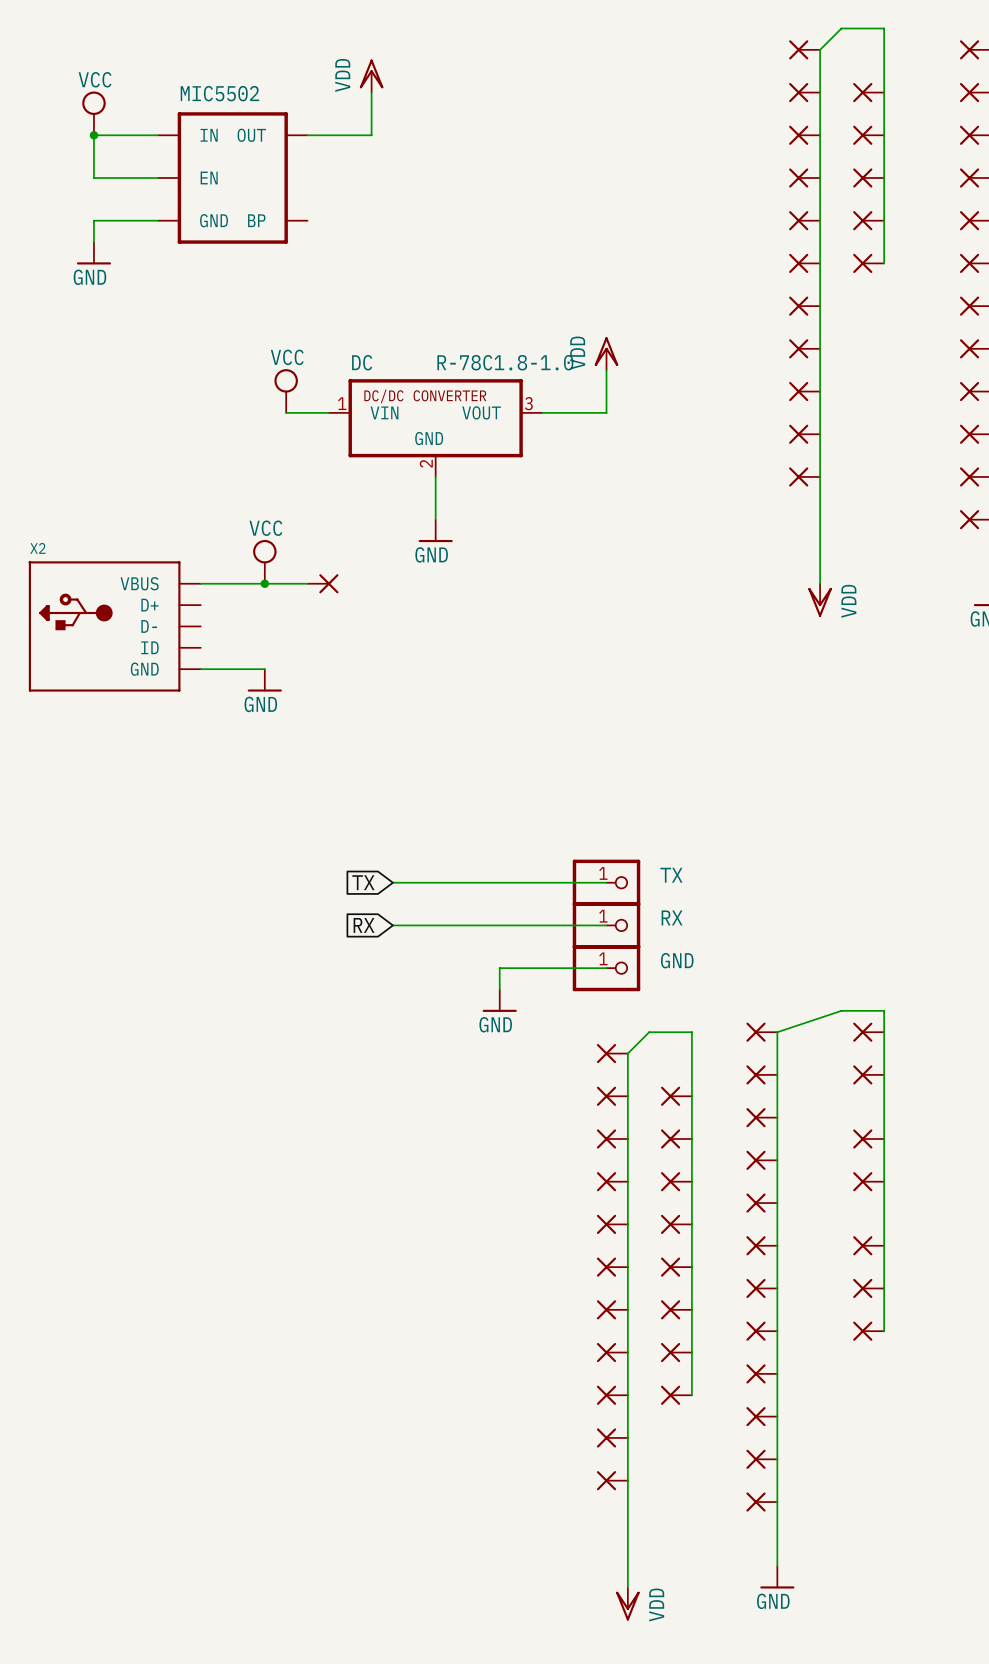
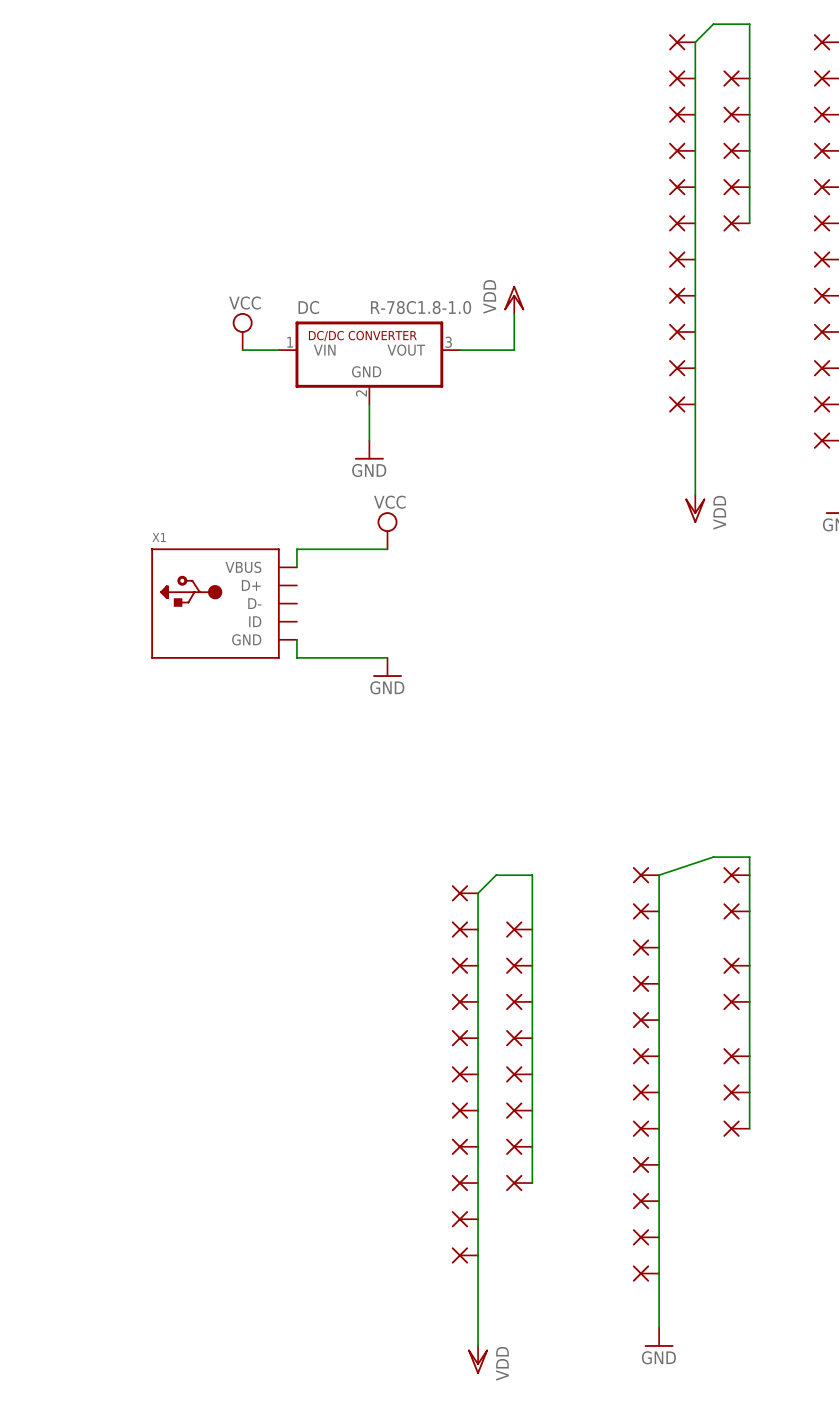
power symbol: VDD (371, 76) -> none
wire: (371, 92) (371, 135) (307, 135) -> none
power symbol: VCC (93, 113) -> none
junction: (93, 135) -> none
wire: (158, 135) (93, 135) (93, 177) (158, 177) -> none
MIC5502: (232, 177) -> none
wire: (158, 220) (93, 220) (93, 242) -> none
power symbol: GND (93, 253) -> none
power symbol position: VCC (264, 561) -> VCC (387, 530)
wire: (200, 583) (307, 583) -> none
junction: (264, 583) -> none
part: (323, 583) -> none
X2: (114, 626) -> none
wire: none -> (387, 549) (296, 549) (296, 567)
wire: (200, 669) (264, 669) -> none
power symbol: GND (264, 680) -> none
X1: none -> (223, 603)
wire: none -> (296, 639) (296, 657) (387, 657)
power symbol: none -> GND (387, 667)
global label: TX (363, 882) -> none
wire: (392, 882) (606, 882) -> none
part: TX (606, 882) -> none
global label: RX (364, 925) -> none
wire: (392, 925) (606, 925) -> none
part: RX (606, 925) -> none
wire: (606, 968) (499, 968) (499, 989) -> none
part: GND (606, 968) -> none
power symbol: GND (499, 1000) -> none
part: none -> (464, 893)
part: (612, 1053) -> none
wire: (627, 1053) (649, 1032) (691, 1032) (691, 1395) -> (532, 893) (532, 875) (496, 875) (478, 893) (478, 1345)
part: none -> (464, 929)
part: (676, 1096) -> none
part: none -> (464, 965)
part: (676, 1138) -> none
part: none -> (464, 1001)
part: (676, 1181) -> none
part: none -> (464, 1038)
part: (676, 1224) -> none
part: none -> (464, 1074)
part: (676, 1267) -> none
part: none -> (464, 1110)
part: (676, 1309) -> none
part: none -> (464, 1146)
part: (676, 1352) -> none
part: none -> (464, 1183)
wire: (627, 1395) (627, 1587) -> none
part: (676, 1395) -> none
part: none -> (464, 1219)
part: (612, 1437) -> none
part: none -> (464, 1255)
part: (612, 1480) -> none
power symbol position: VDD (627, 1604) -> VDD (478, 1360)

